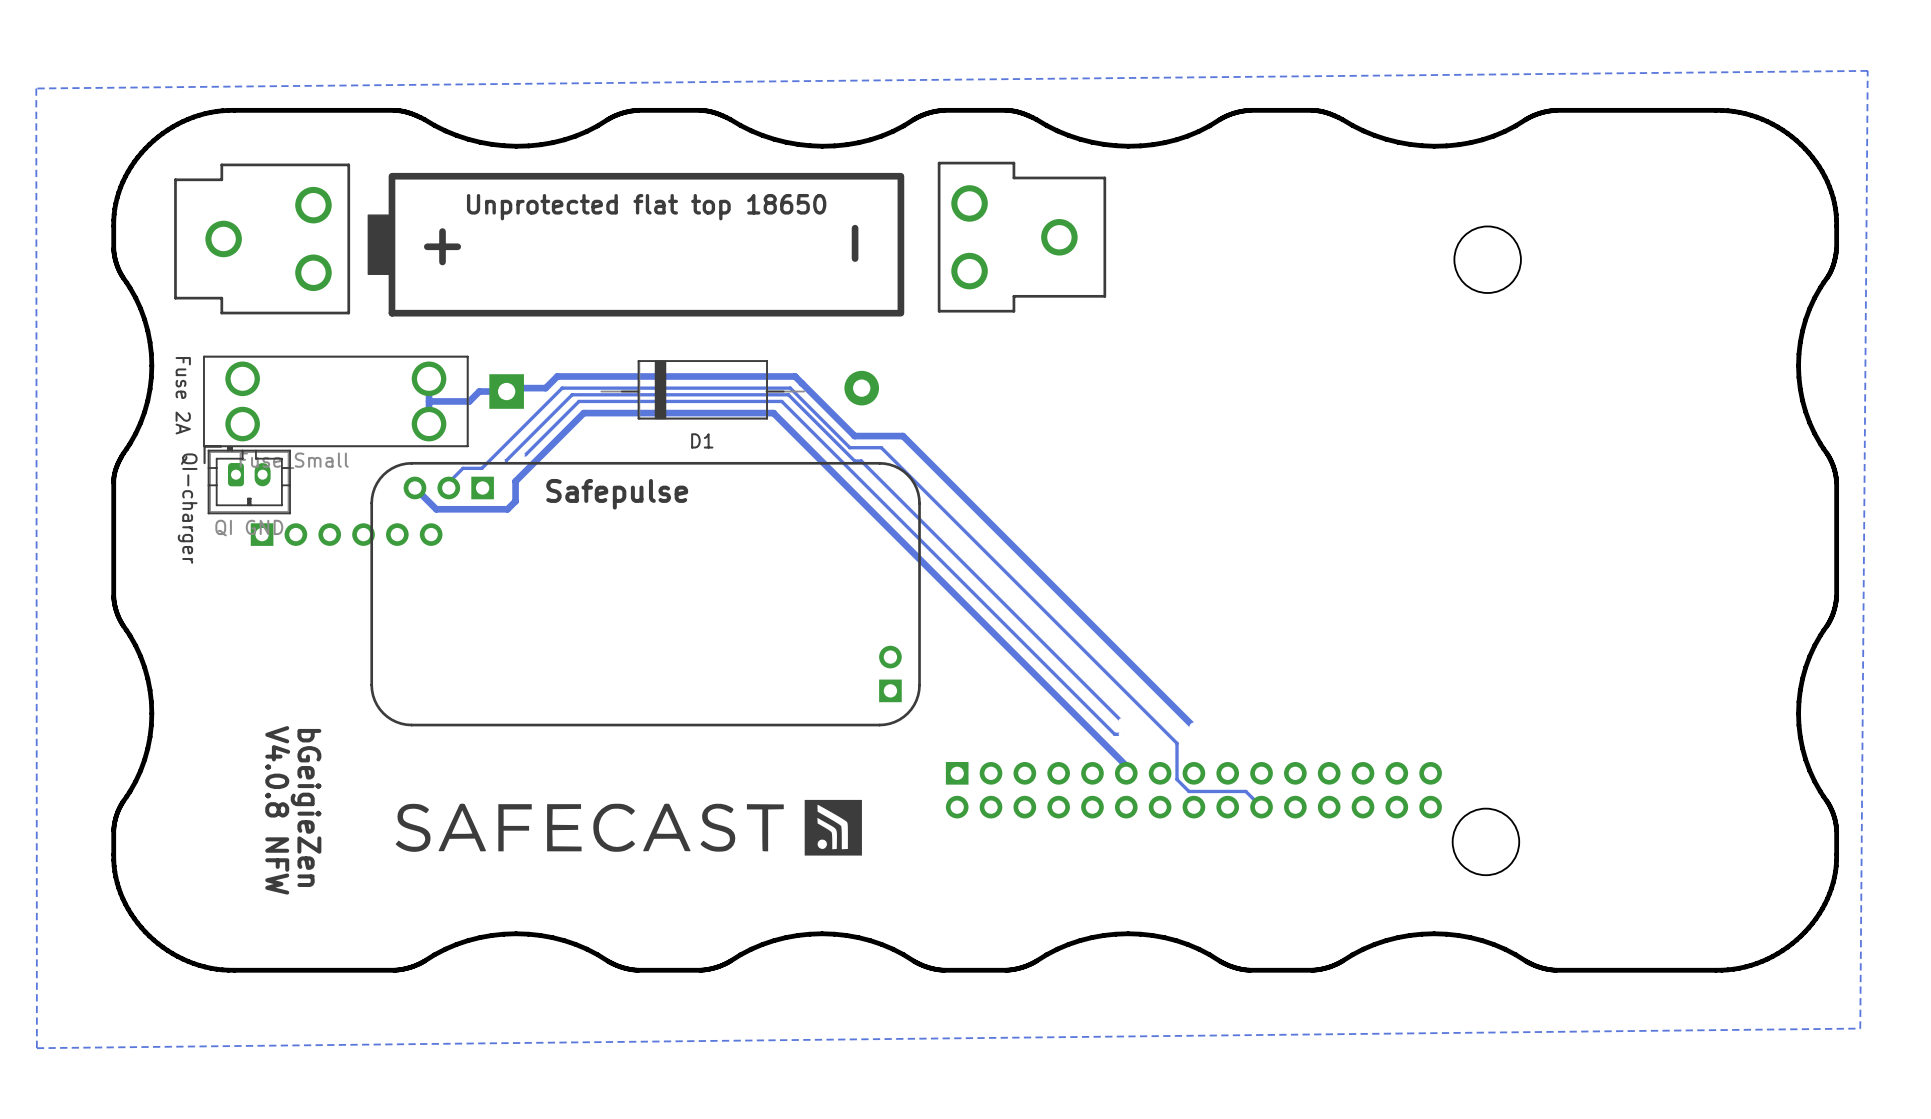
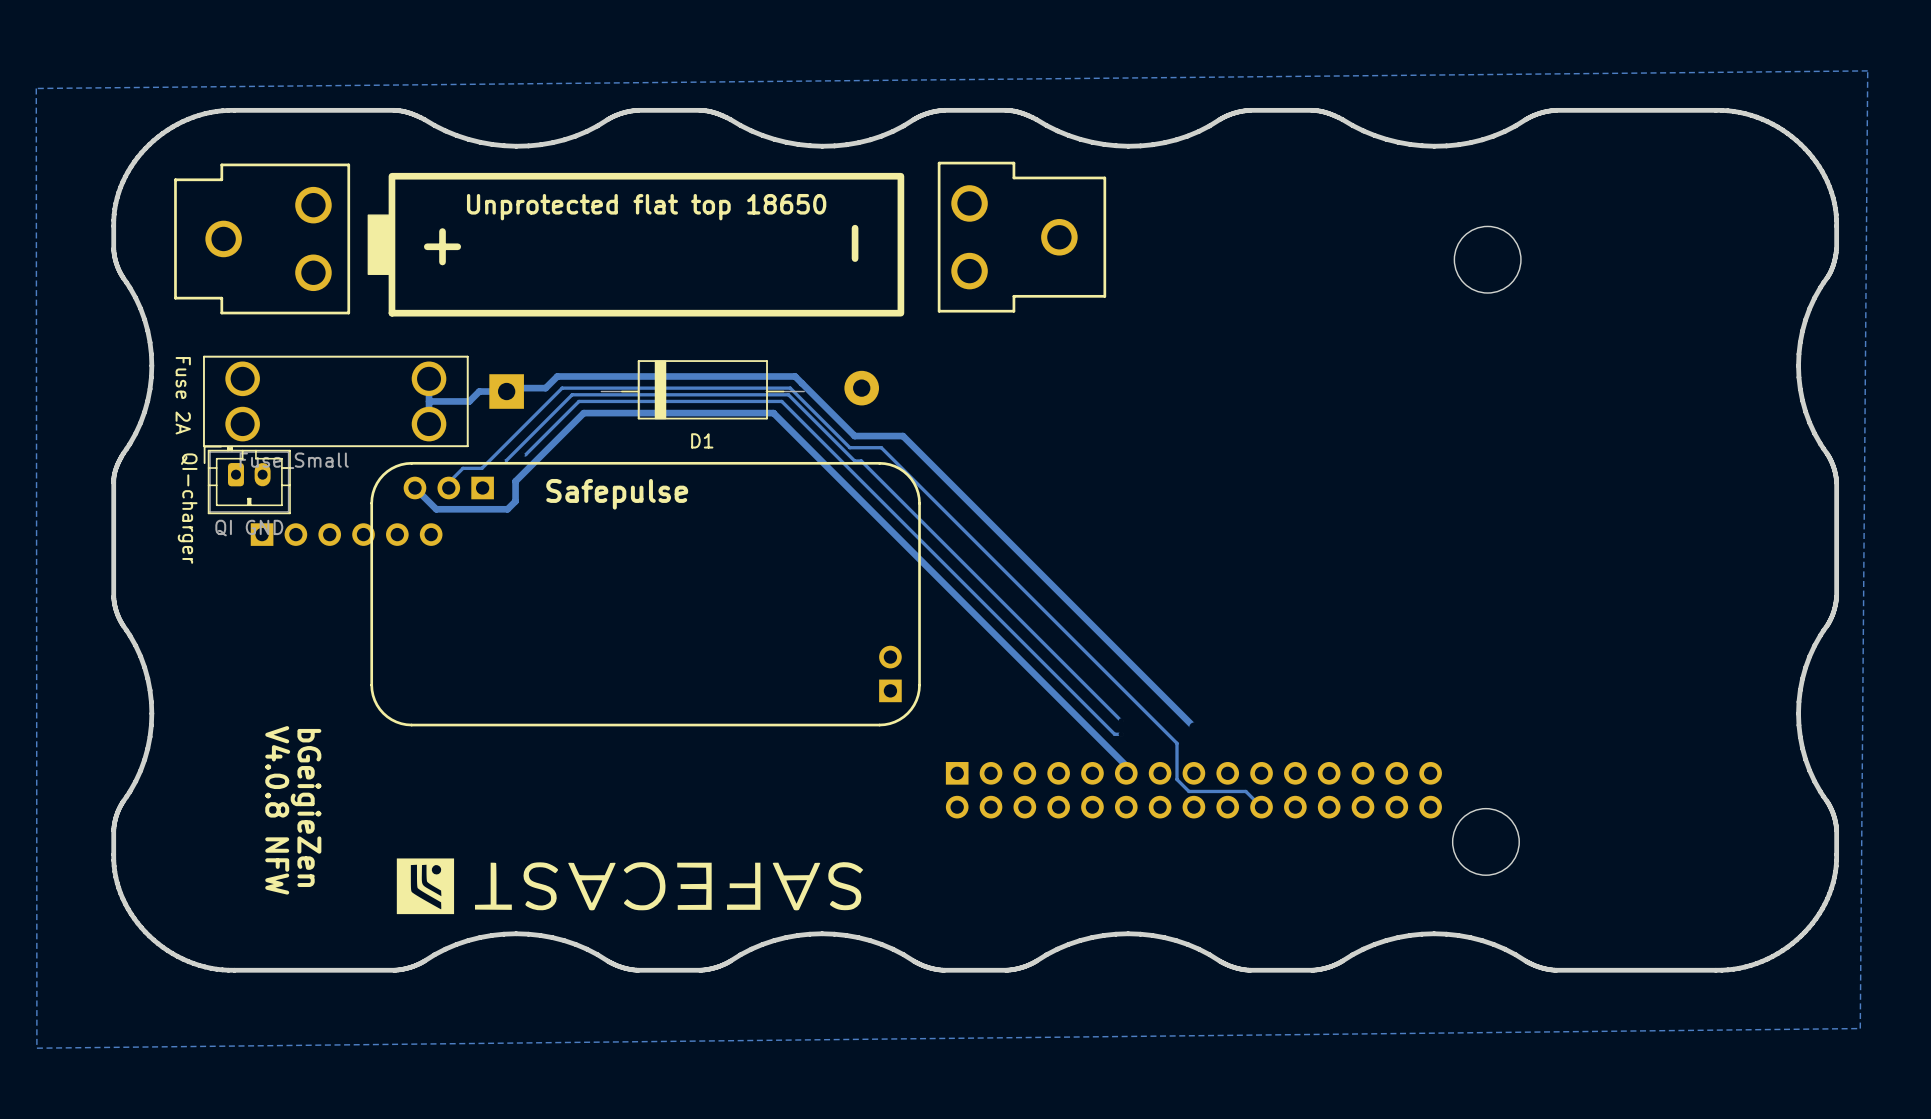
drawing: [395, 799, 862, 856] -> none
drawing: none -> [396, 858, 864, 915]

